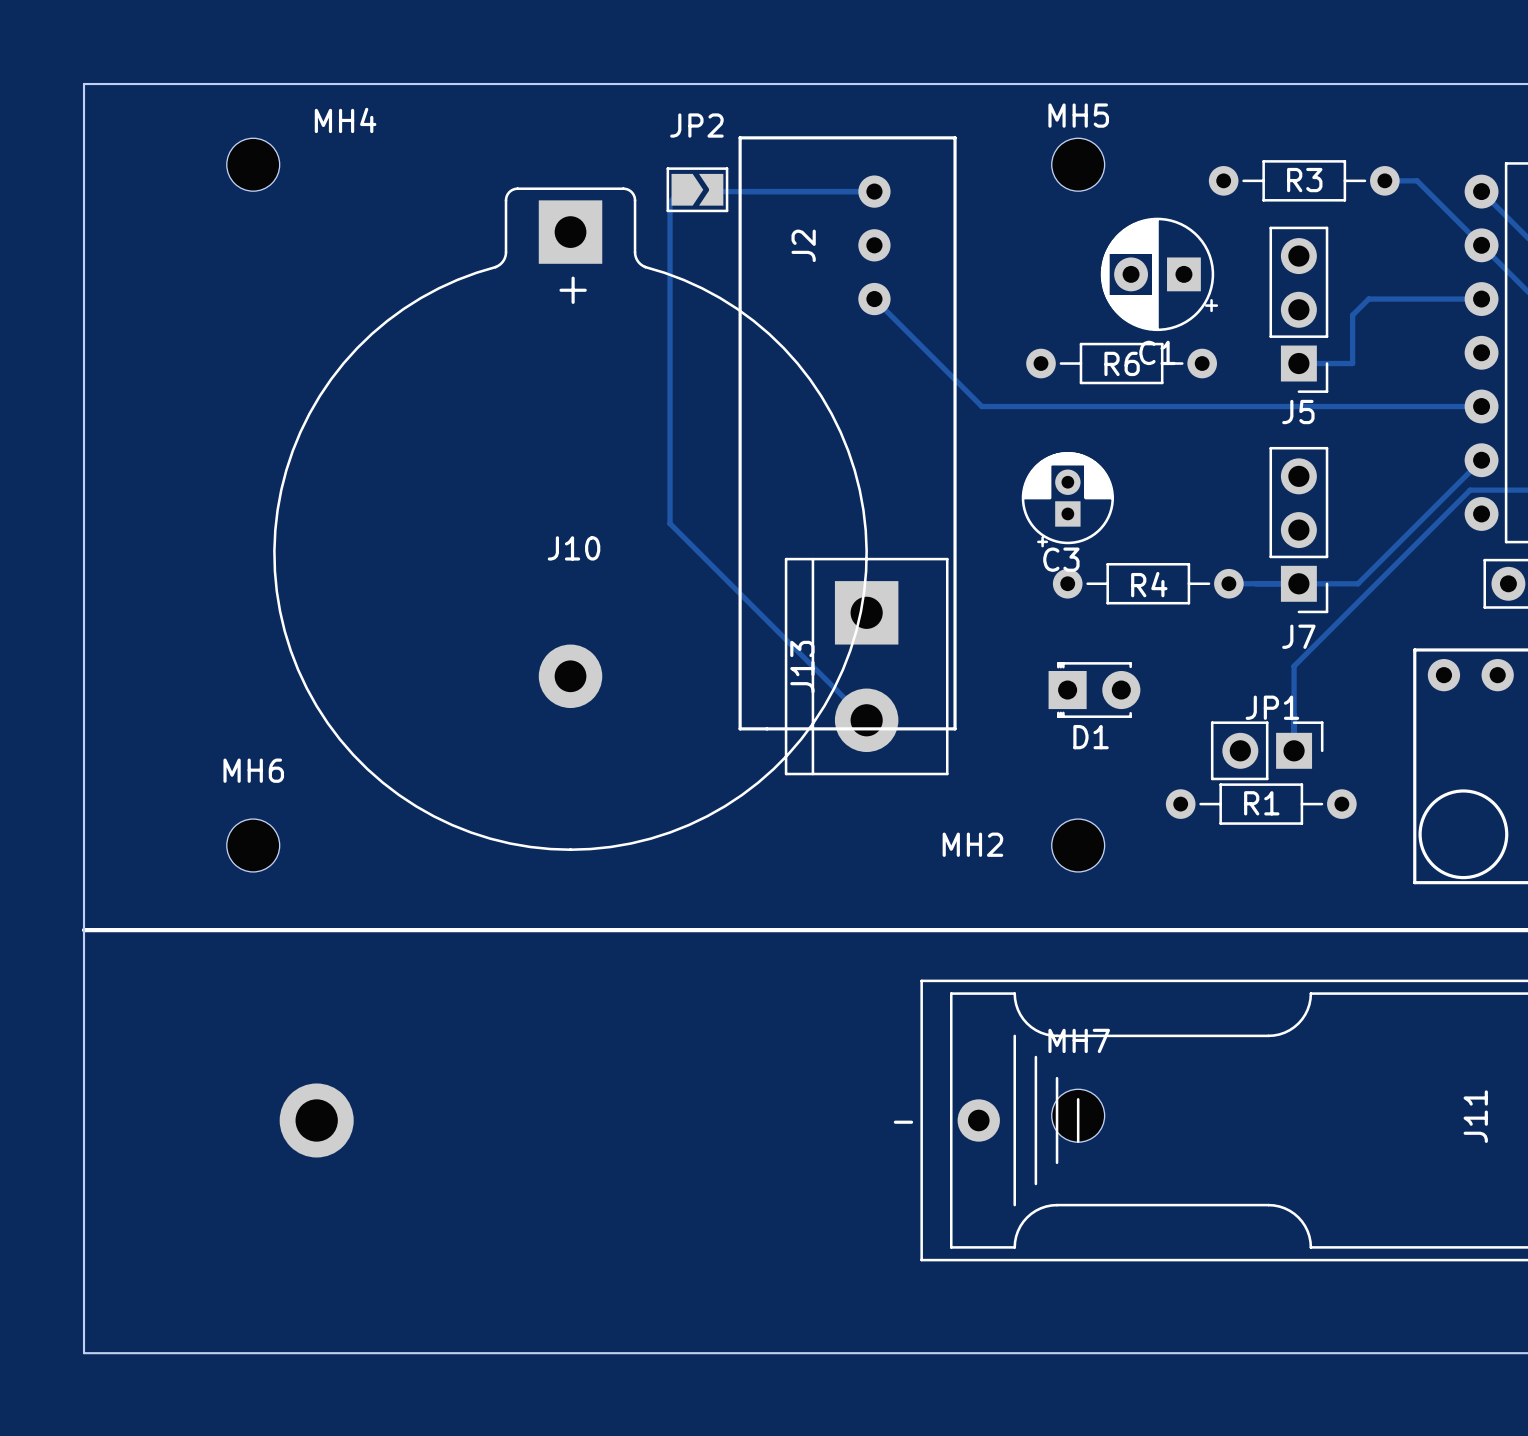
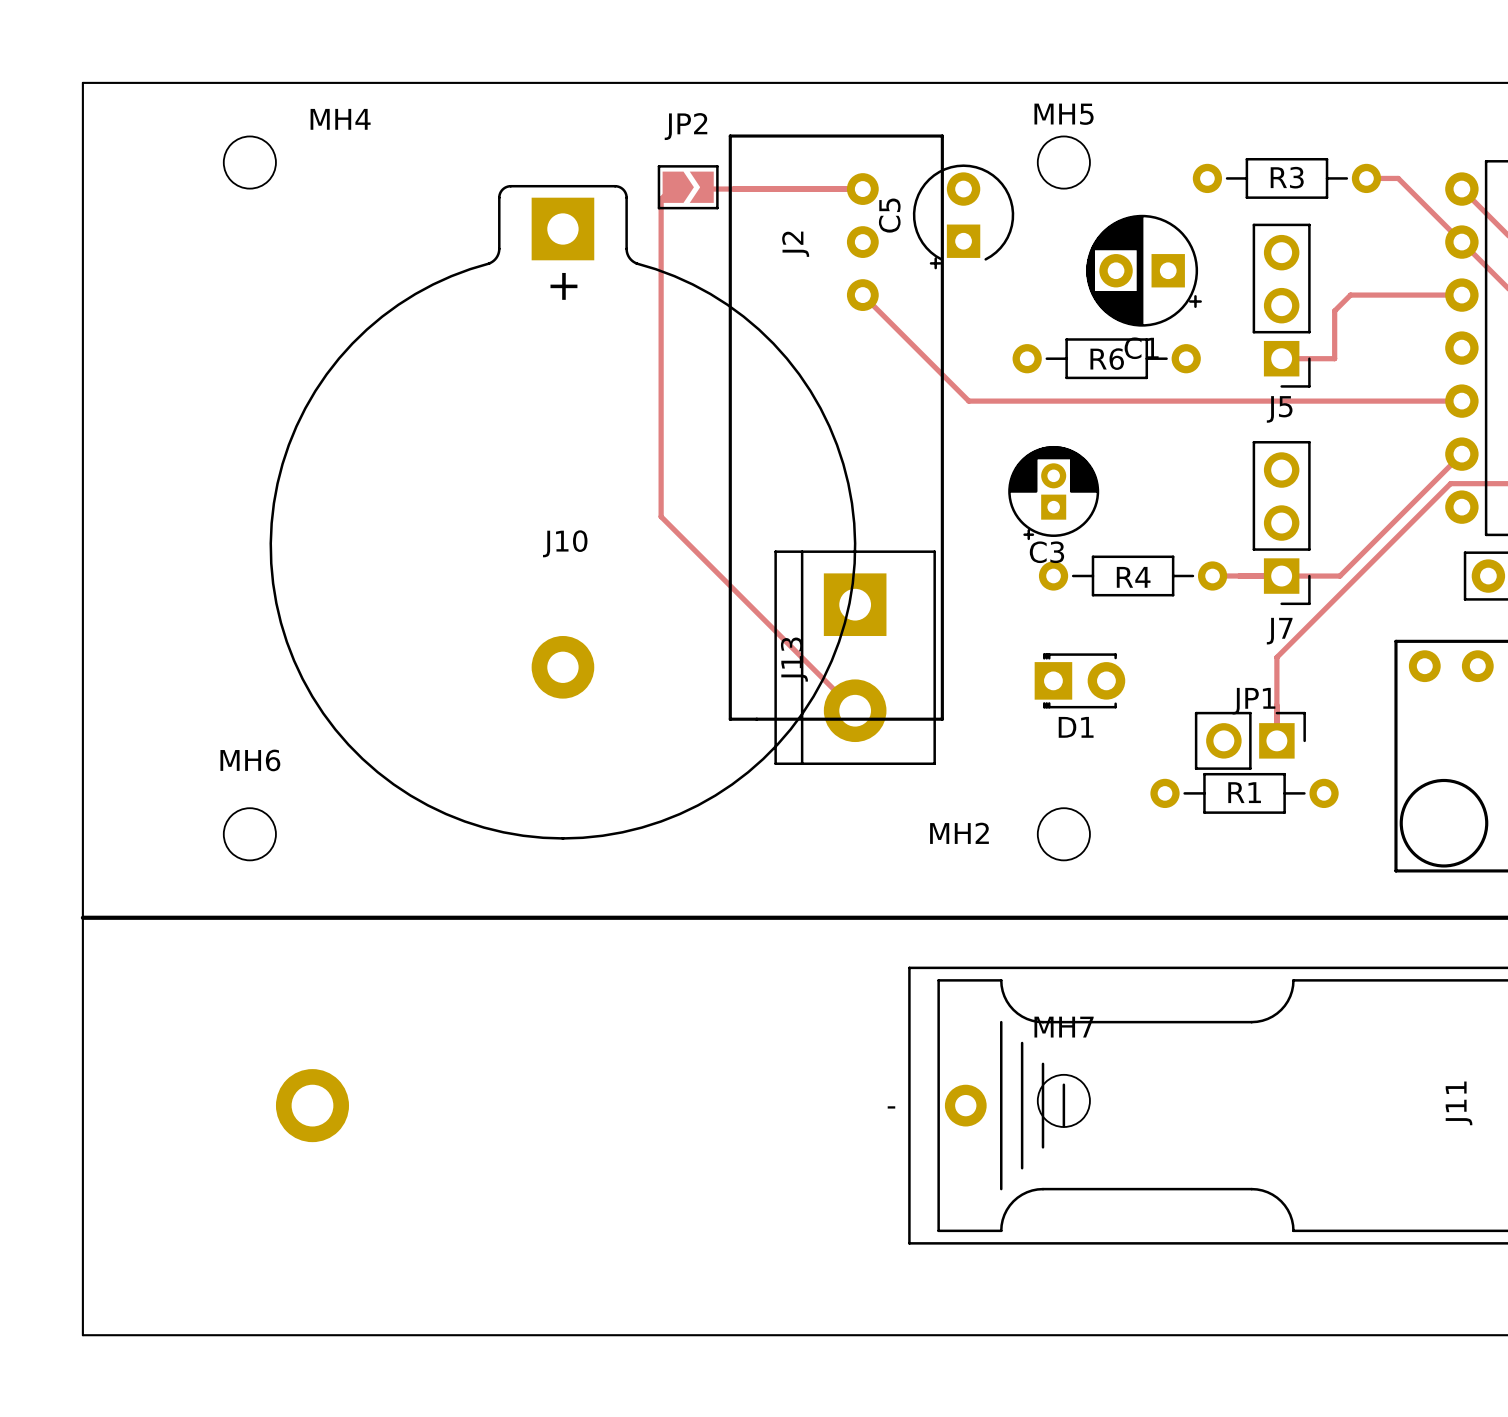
C5: none -> (963, 216)

